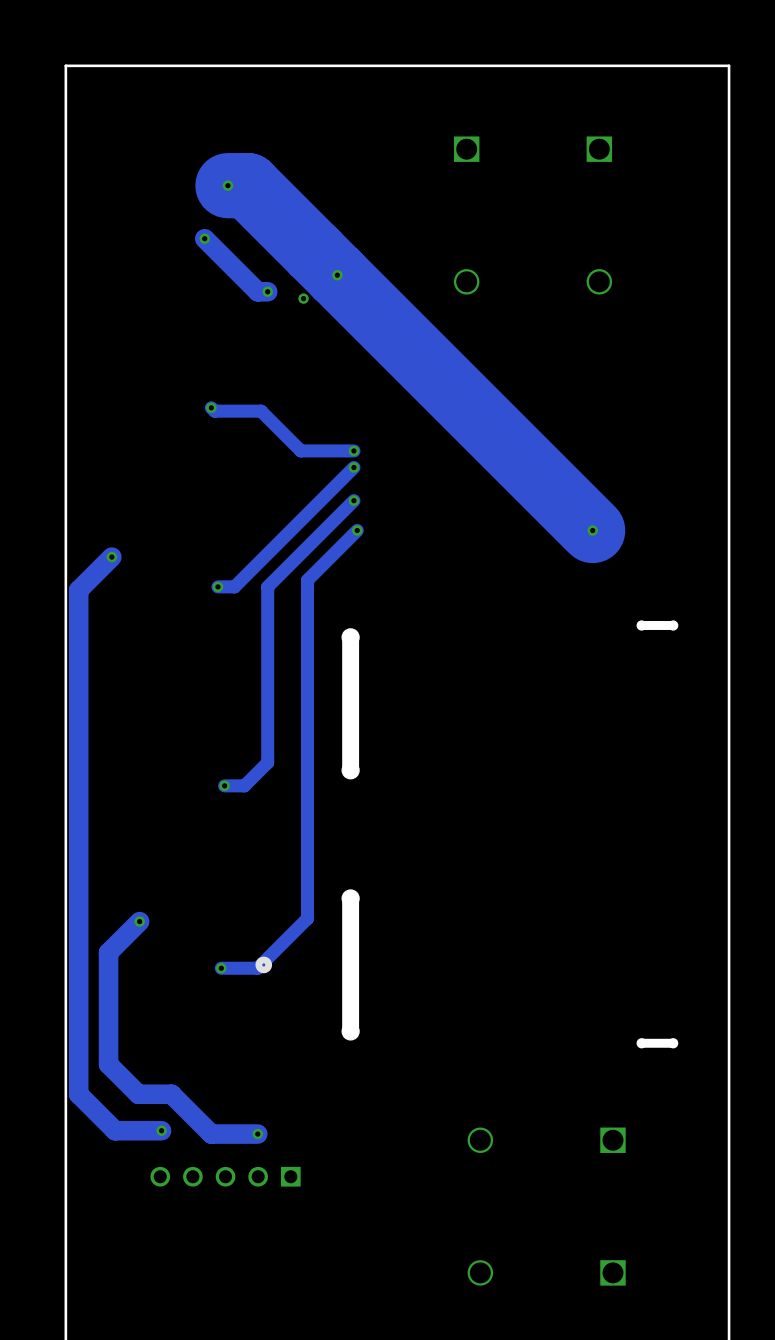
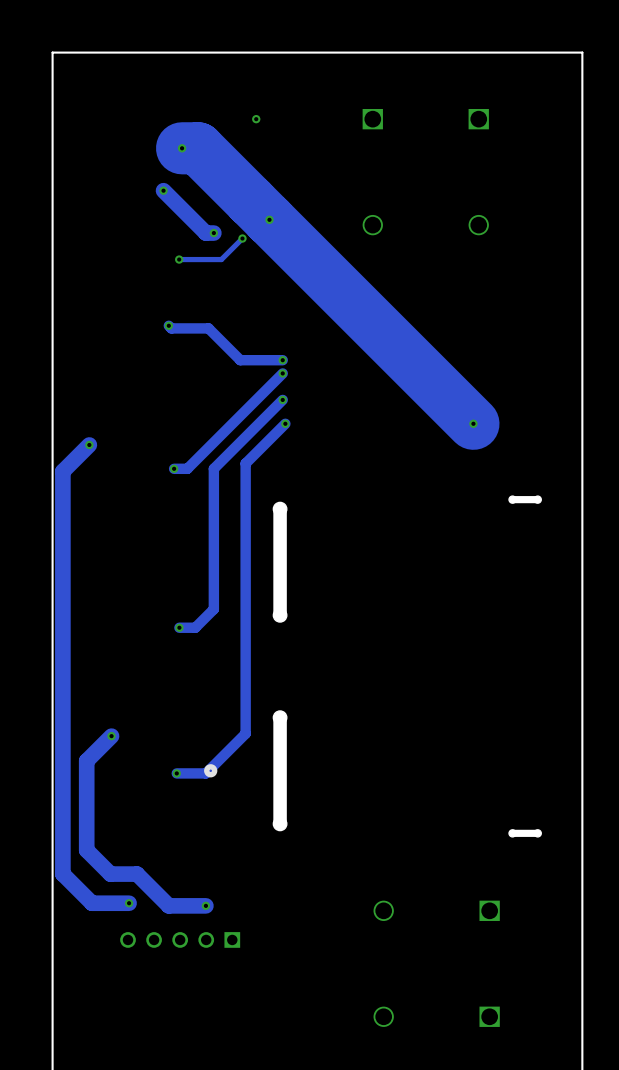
via: none -> (256, 119)
track: none -> (242, 238) (221, 259) (179, 259)
via: none -> (179, 259)

